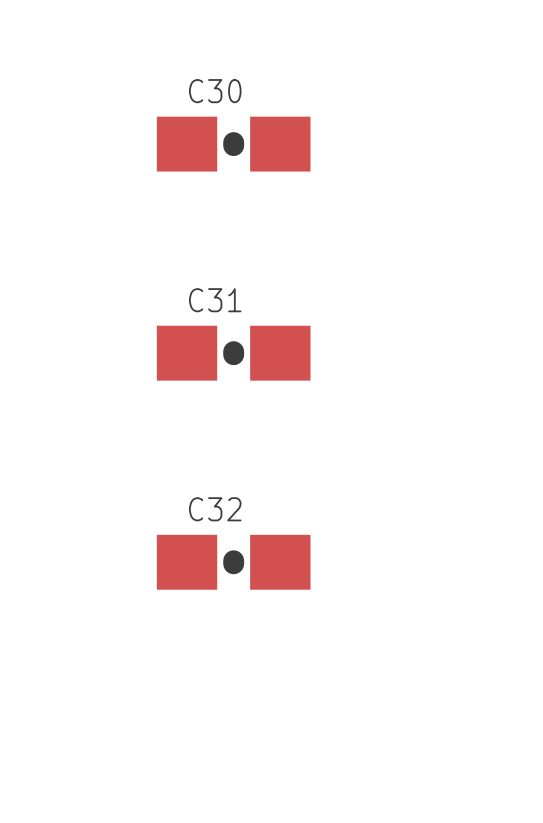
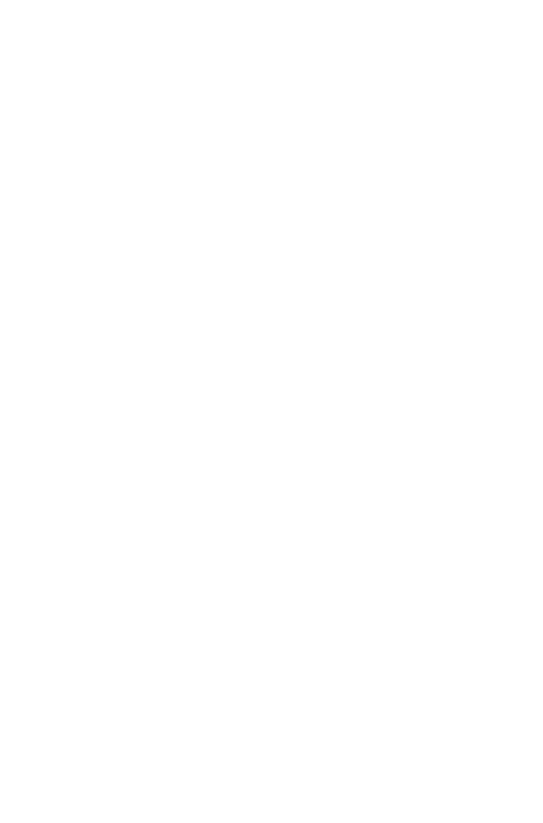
C30: (233, 144) -> none
C31: (233, 353) -> none
C32: (233, 562) -> none

